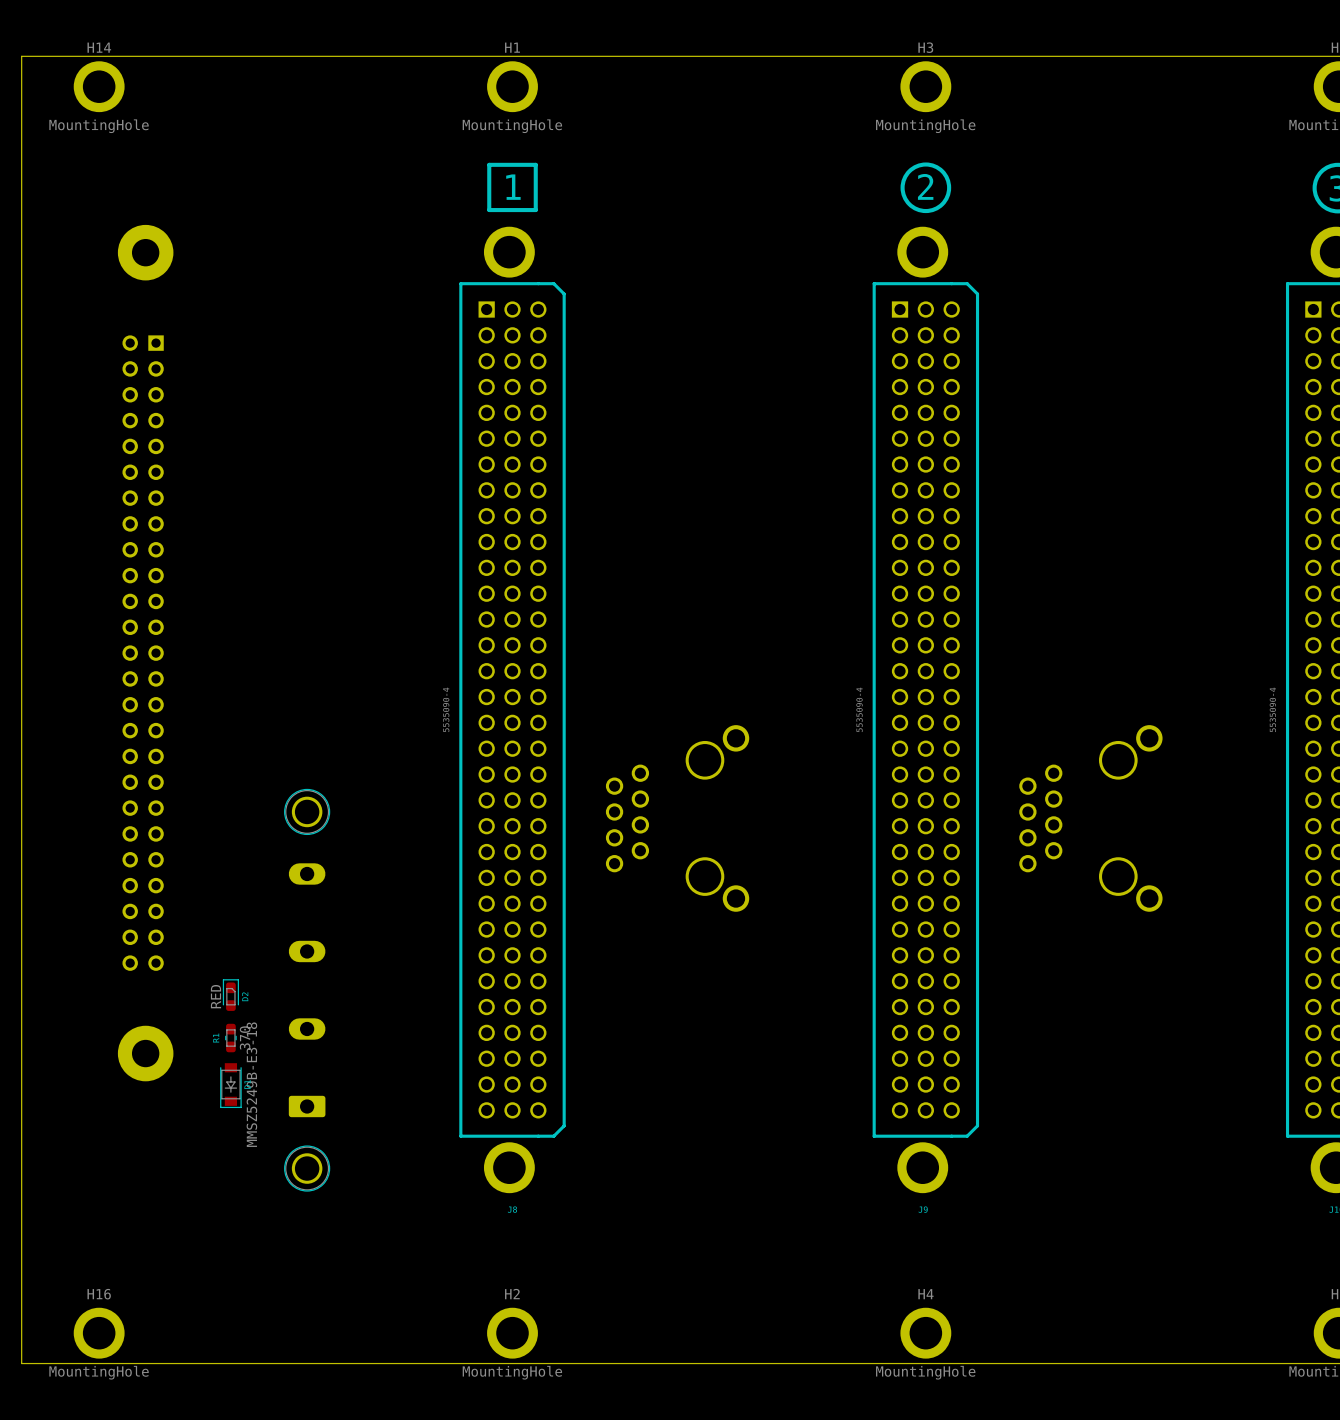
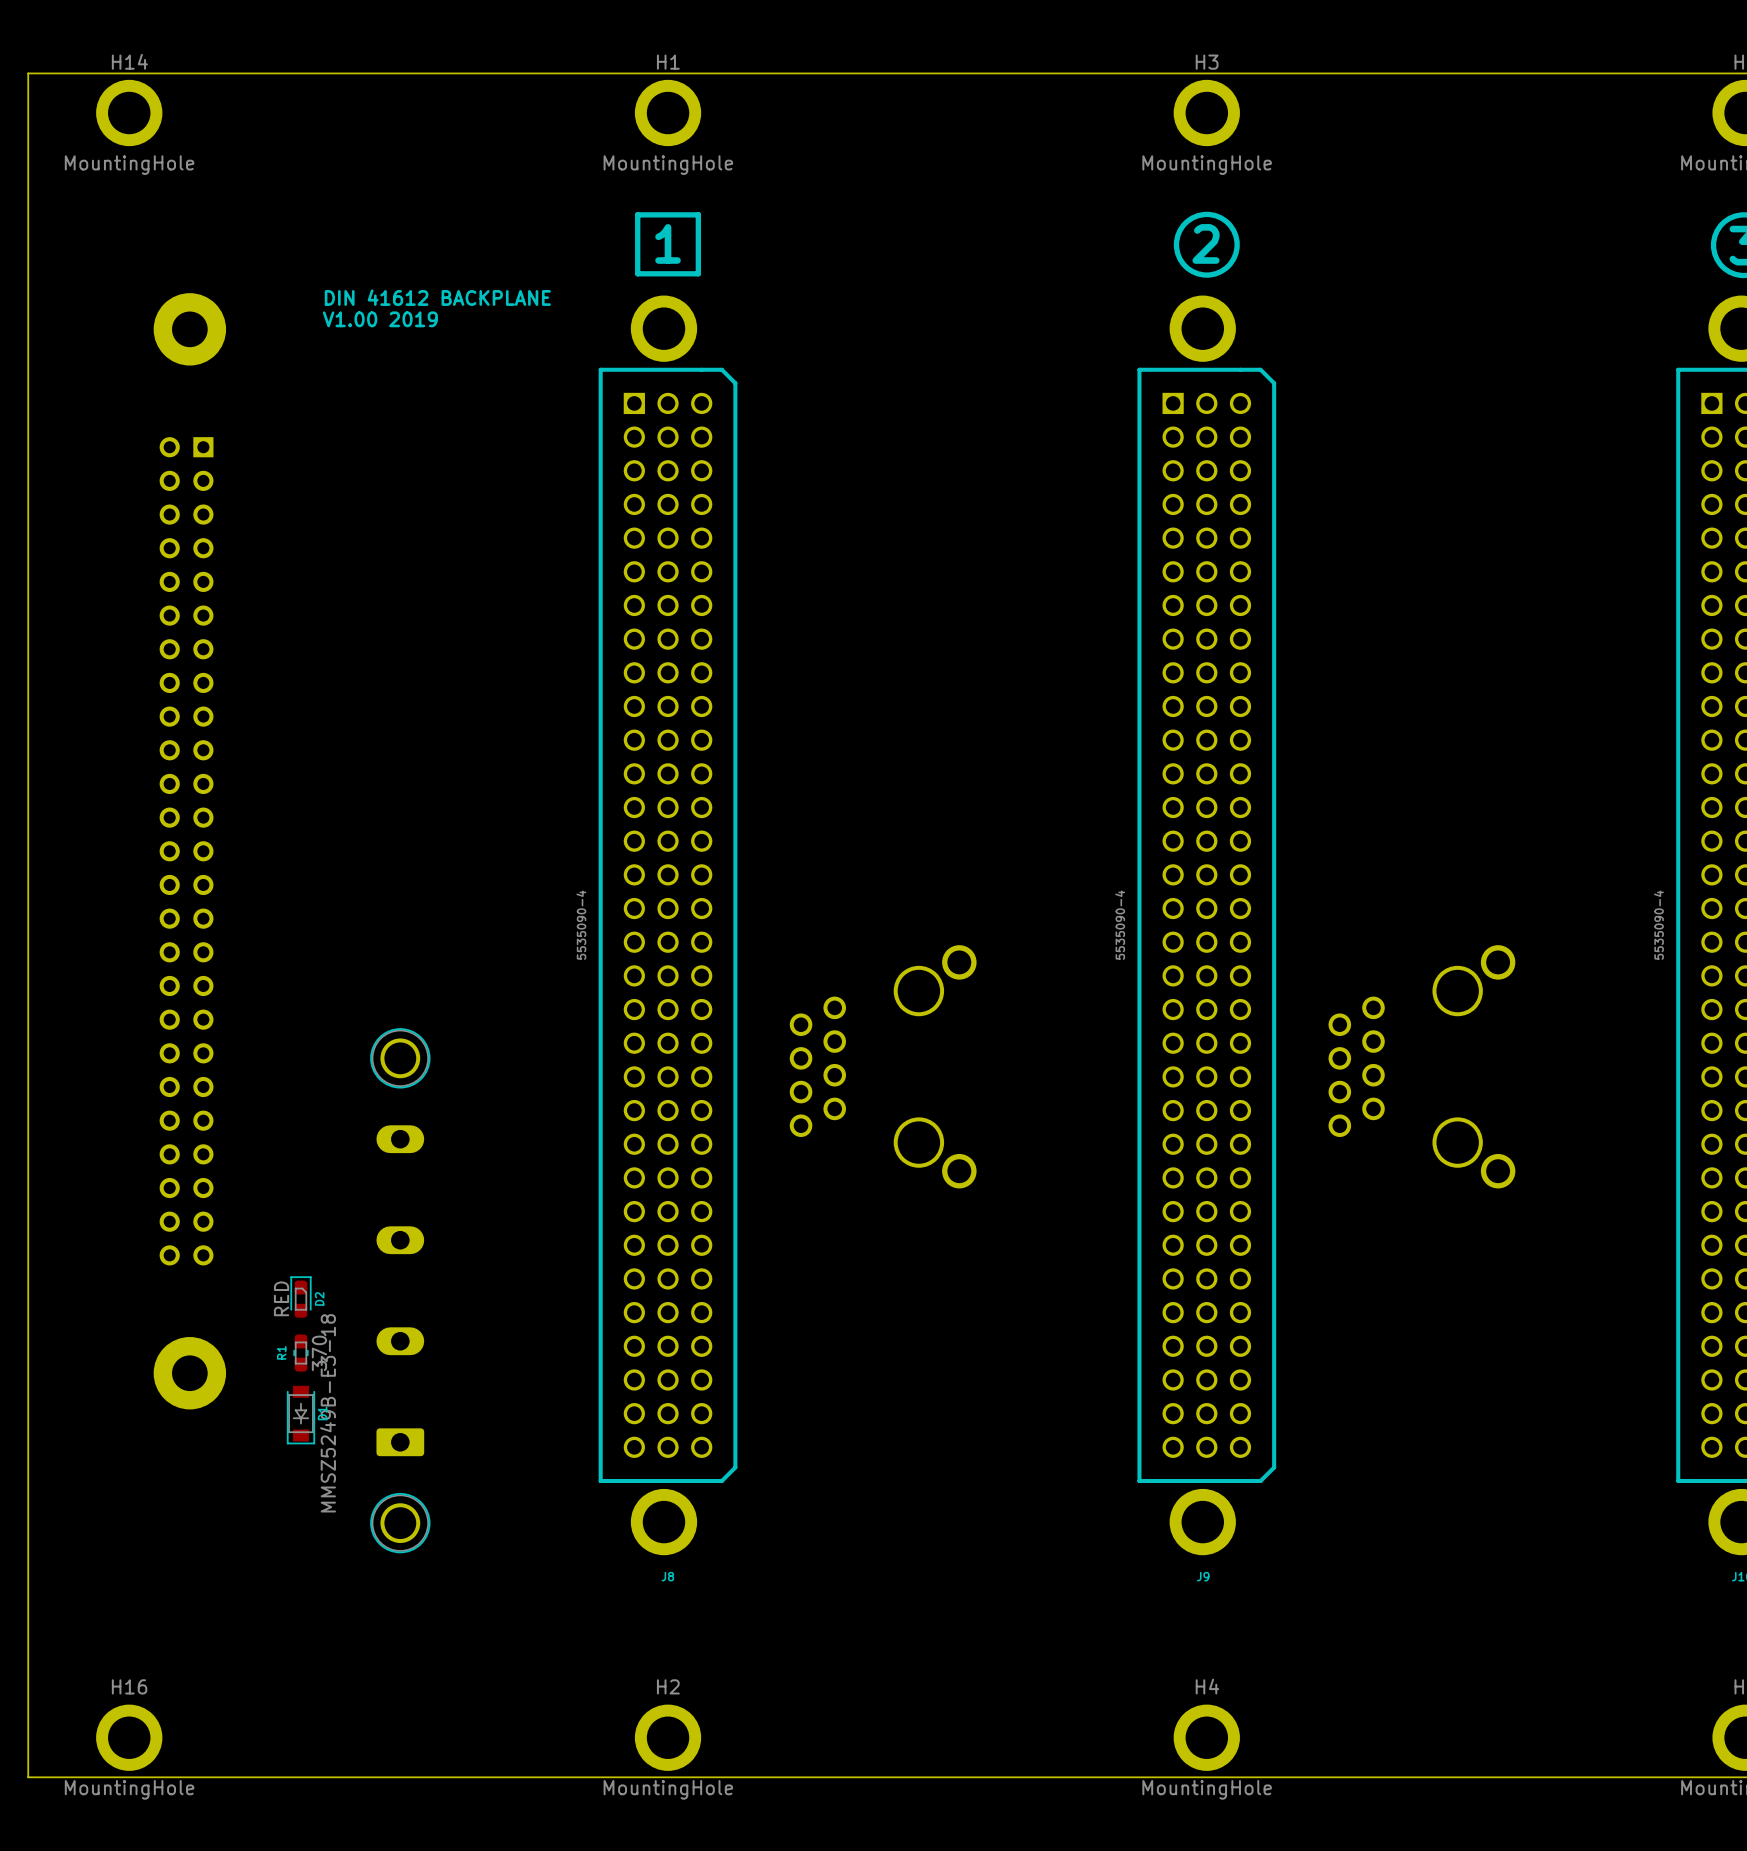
text: none -> DIN 41612 BACKPLANE (437, 297)
text: none -> V1.00 2019 (380, 319)

